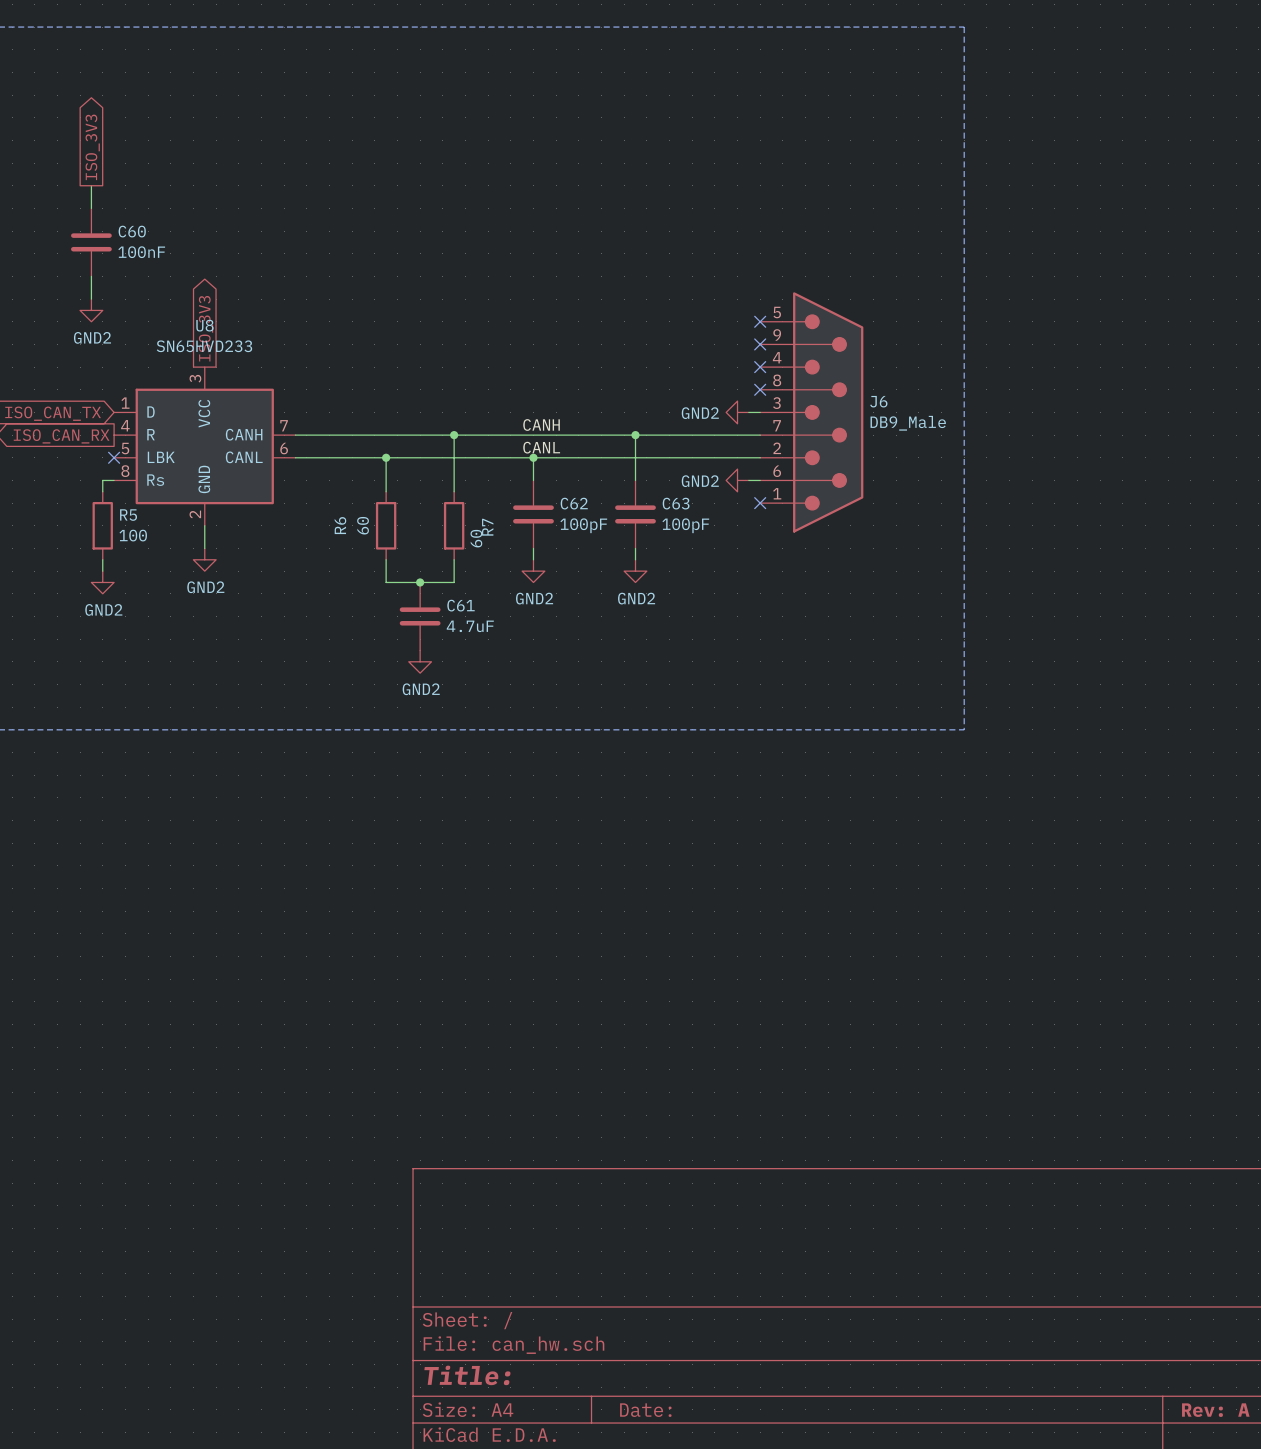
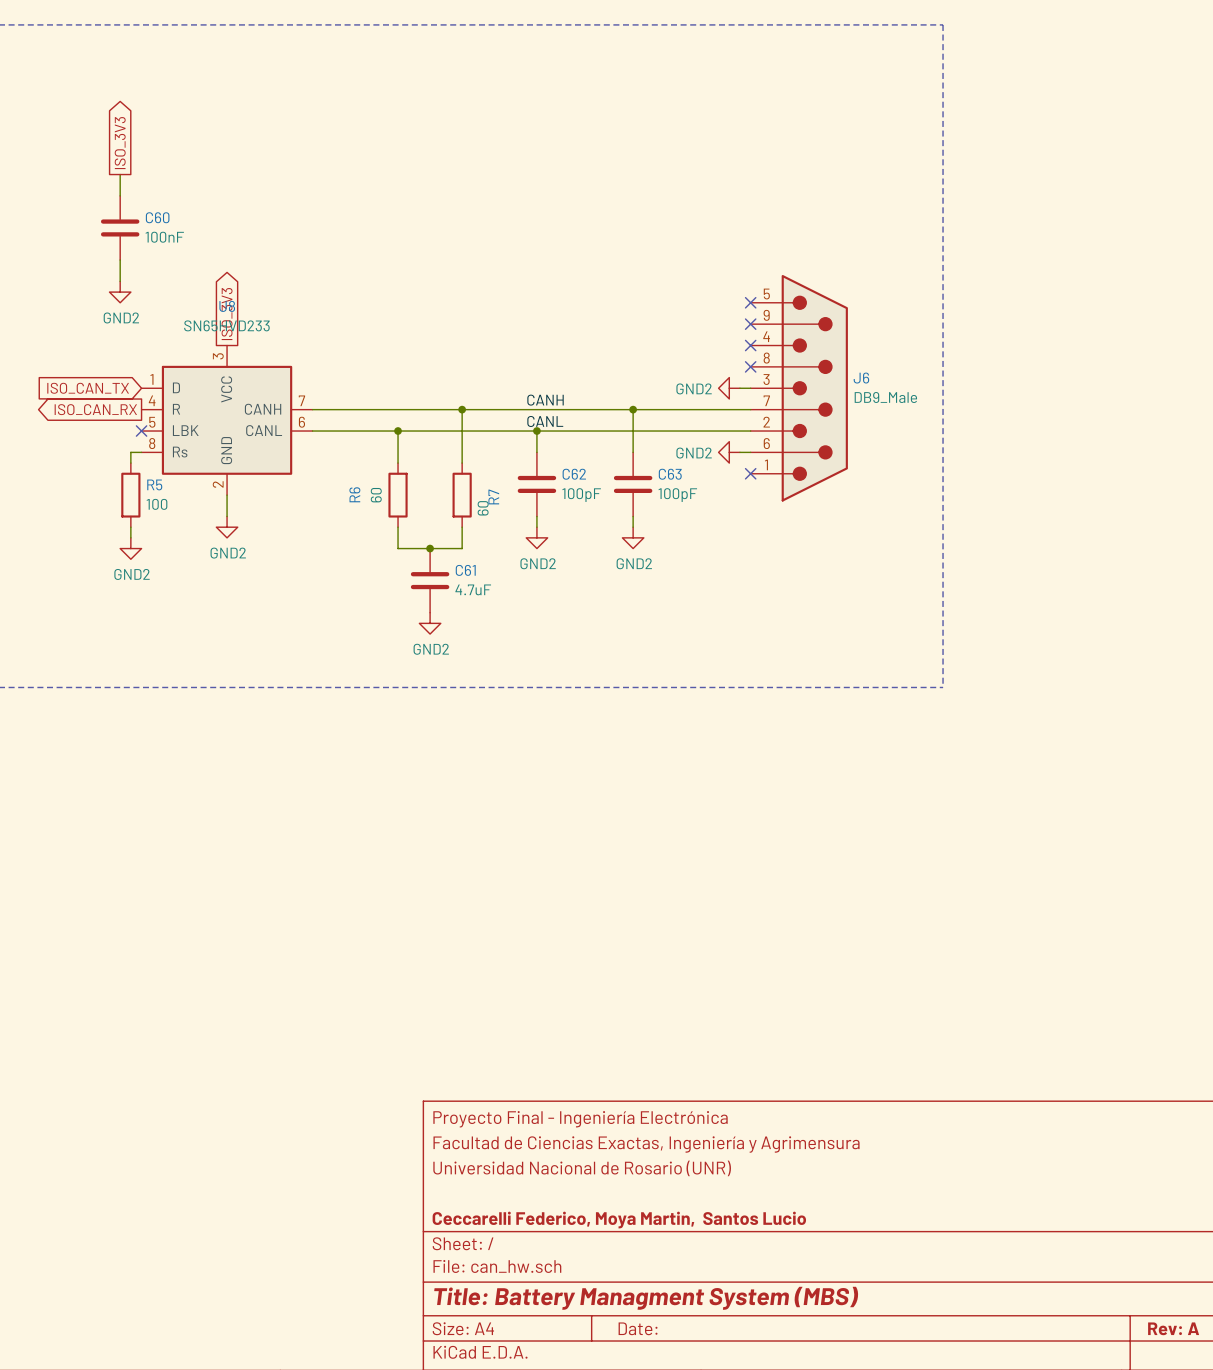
title block: none -> Proyecto Final - Ingeniería Electrónica (580, 1119)
title block: none -> Facultad de Ciencias Exactas, Ingeniería y Agrimensura (646, 1144)
title block: none -> Universidad Nacional de Rosario (UNR) (582, 1168)
title block: none -> Ceccarelli Federico, Moya Martin, Santos Lucio (619, 1220)
title block: Title: (467, 1375) -> Title: Battery Managment System (MBS) (646, 1298)

